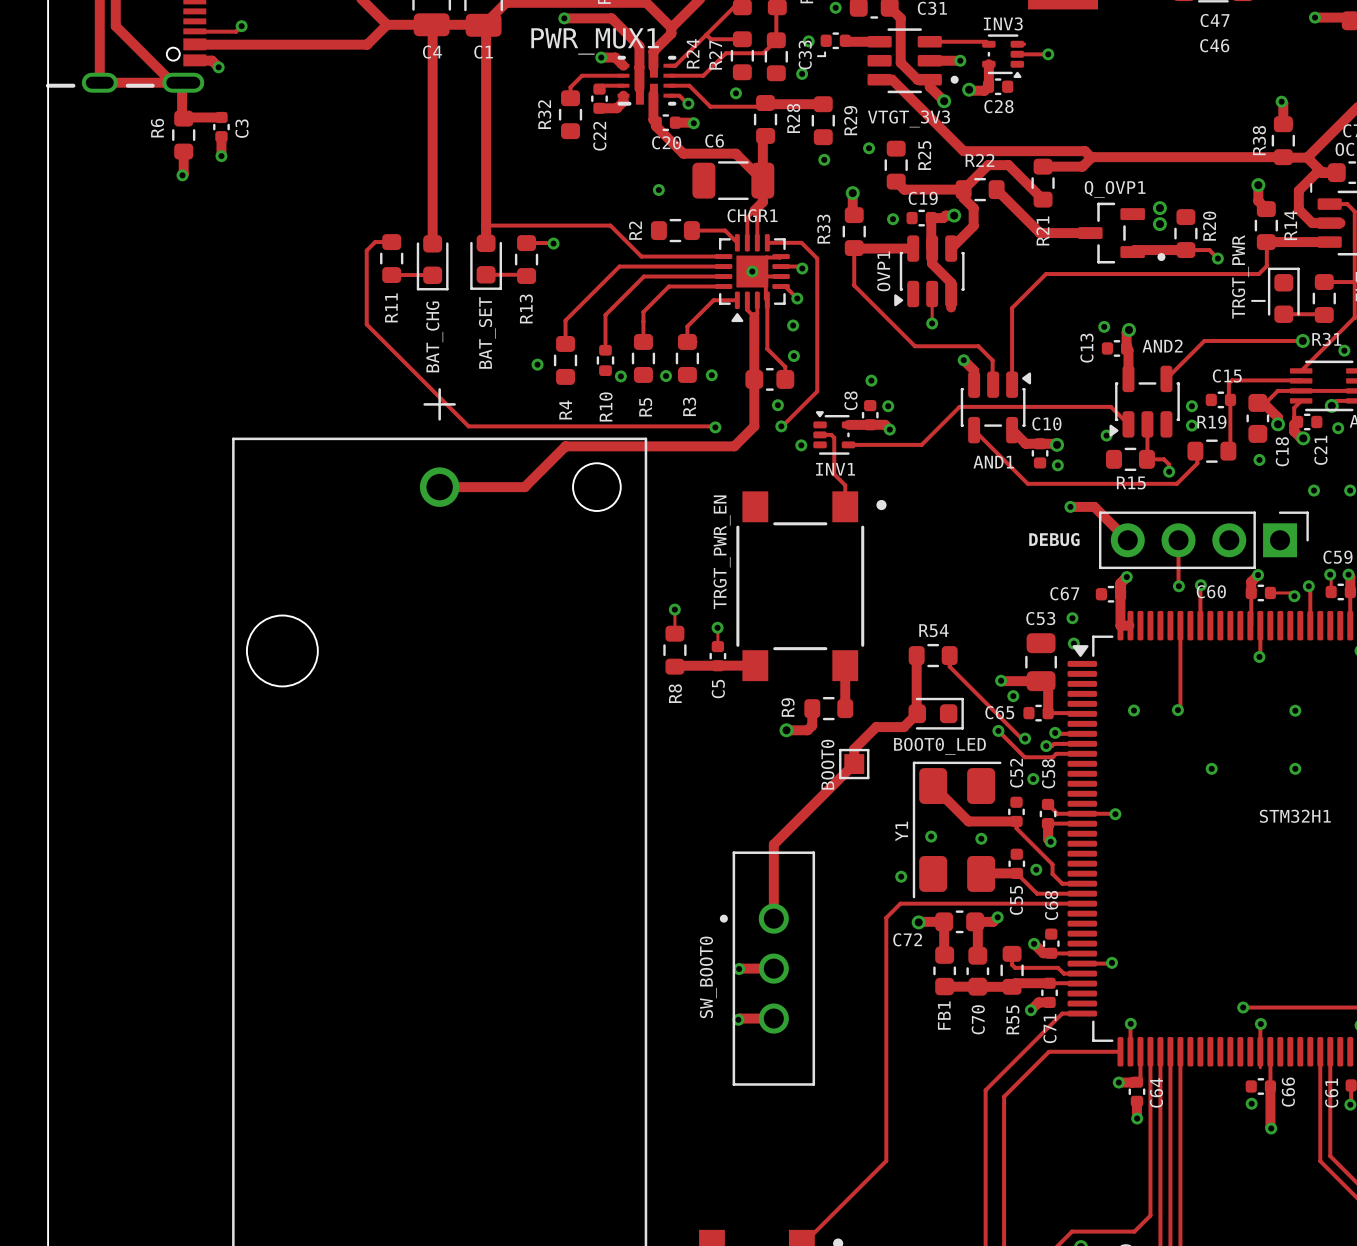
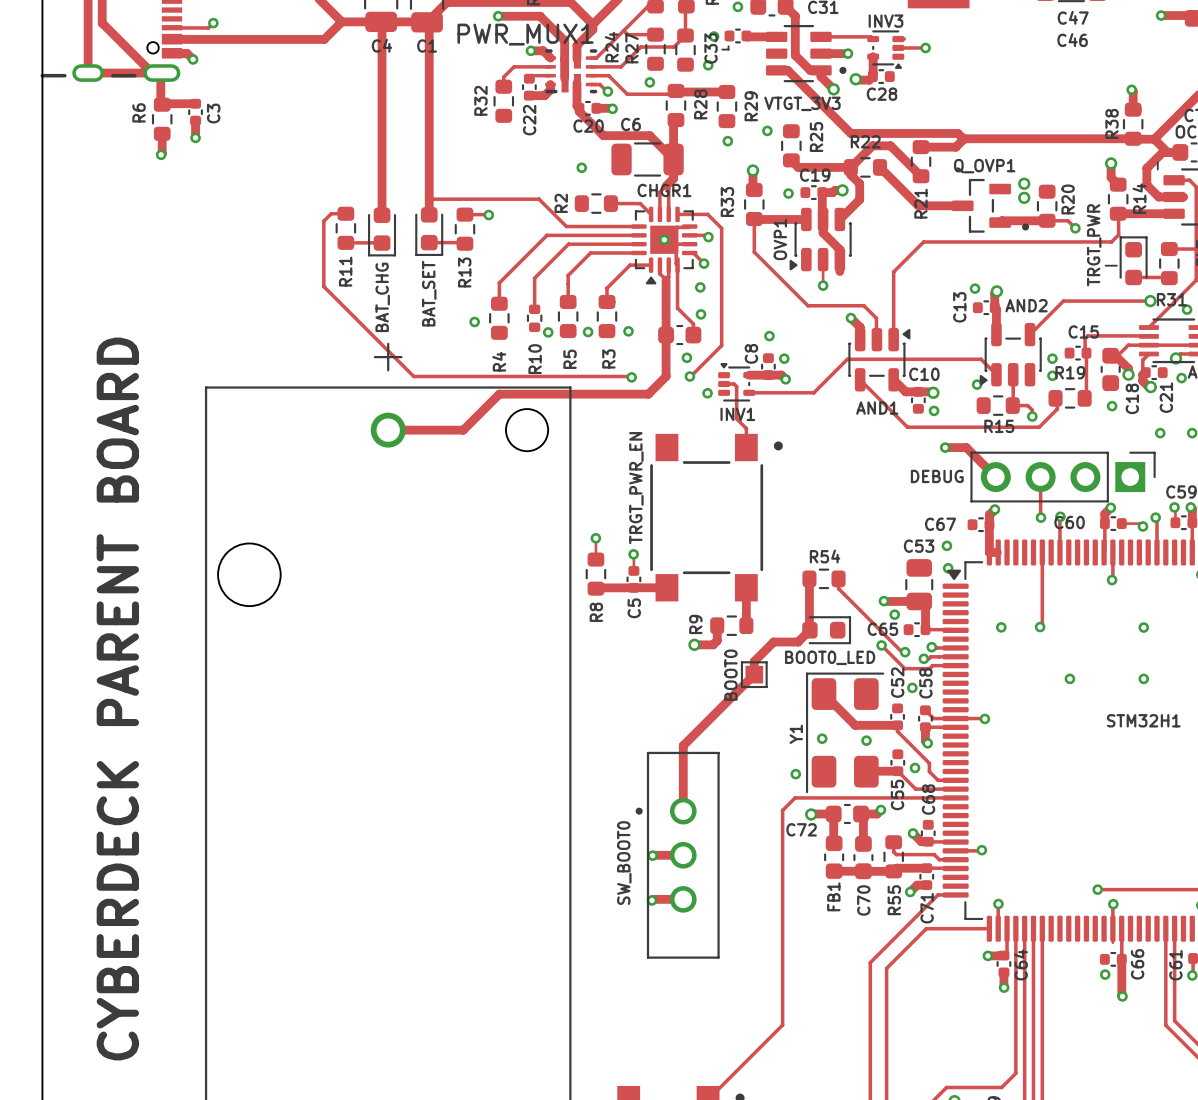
text: none -> CYBERDECK PARENT BOARD (117, 699)

